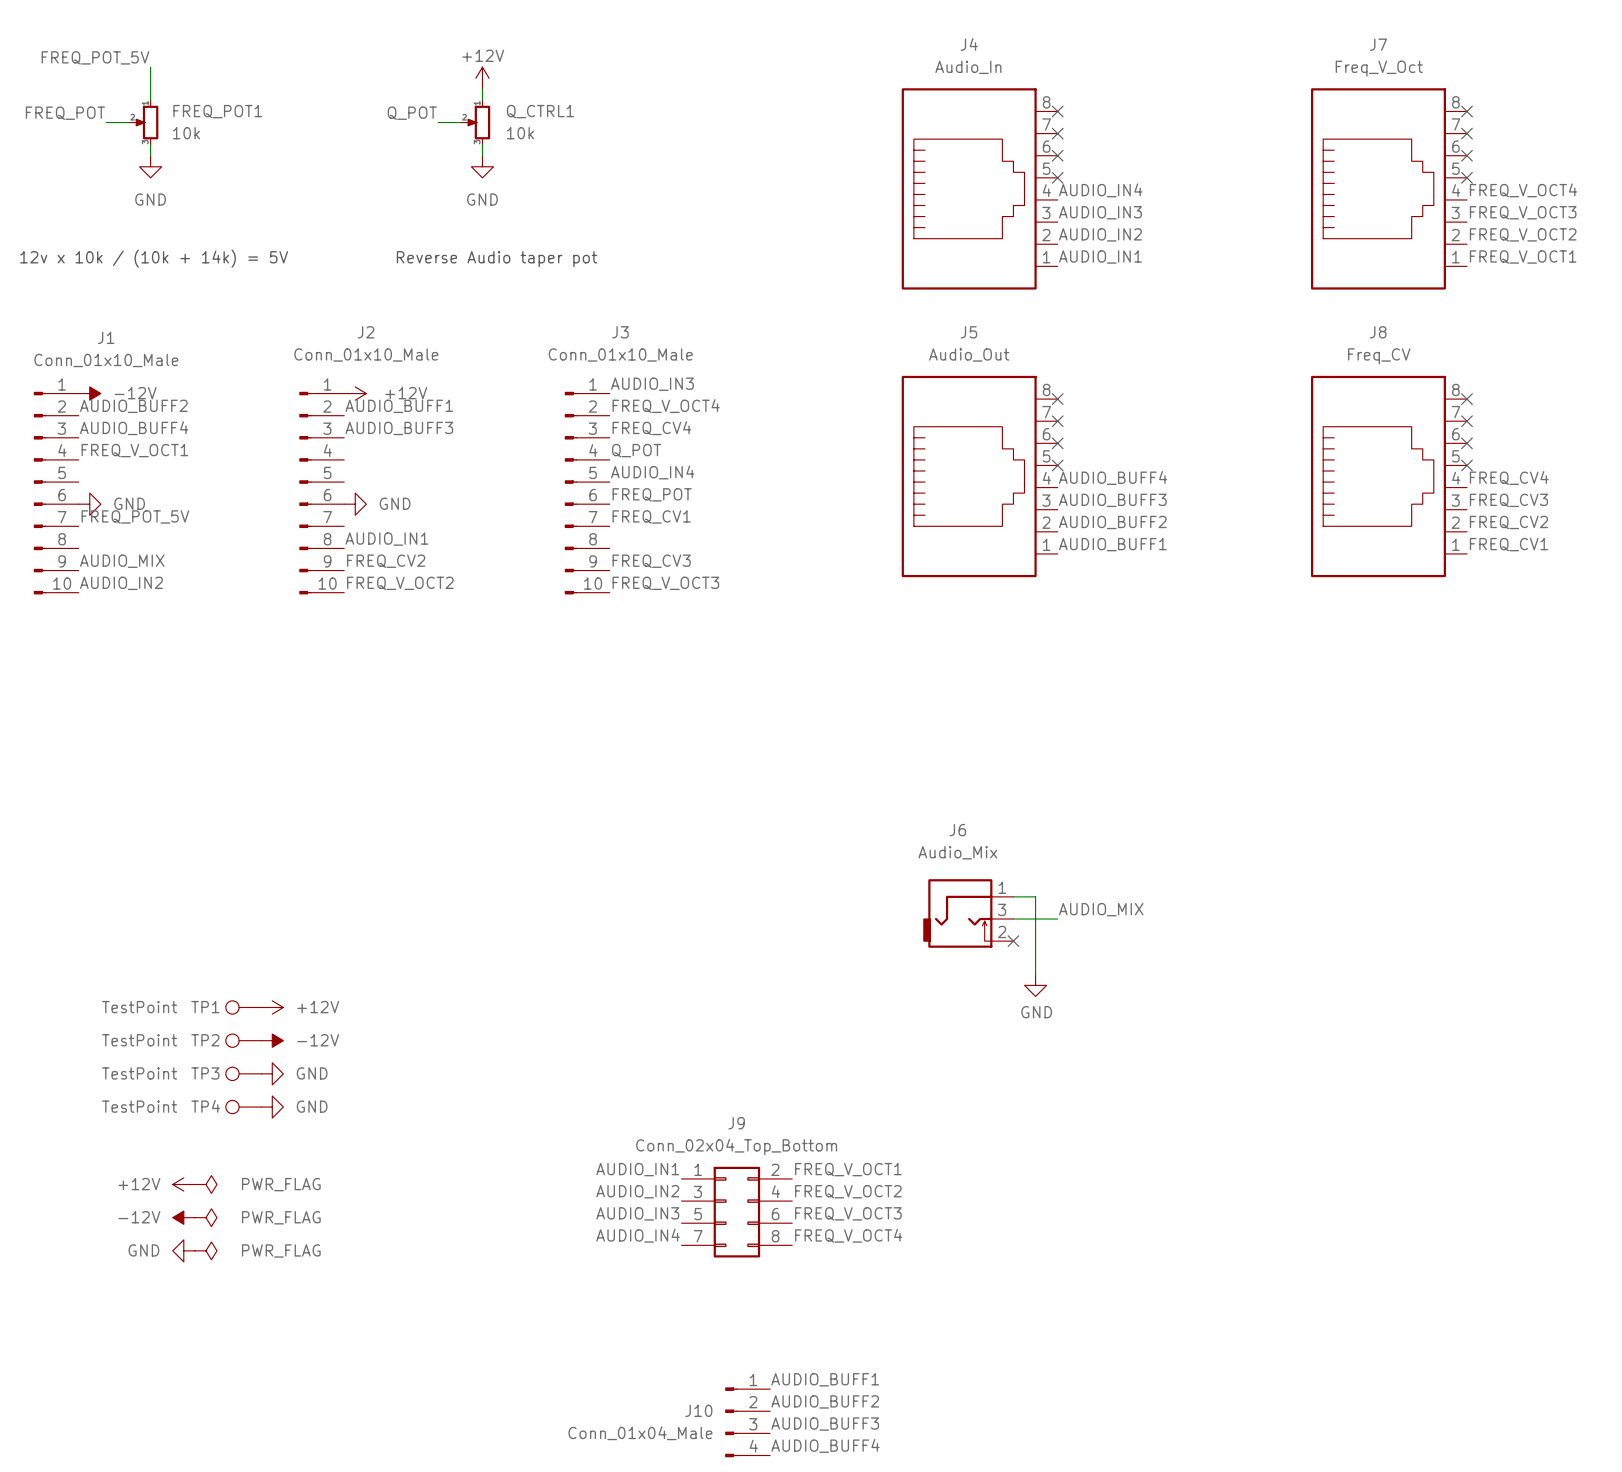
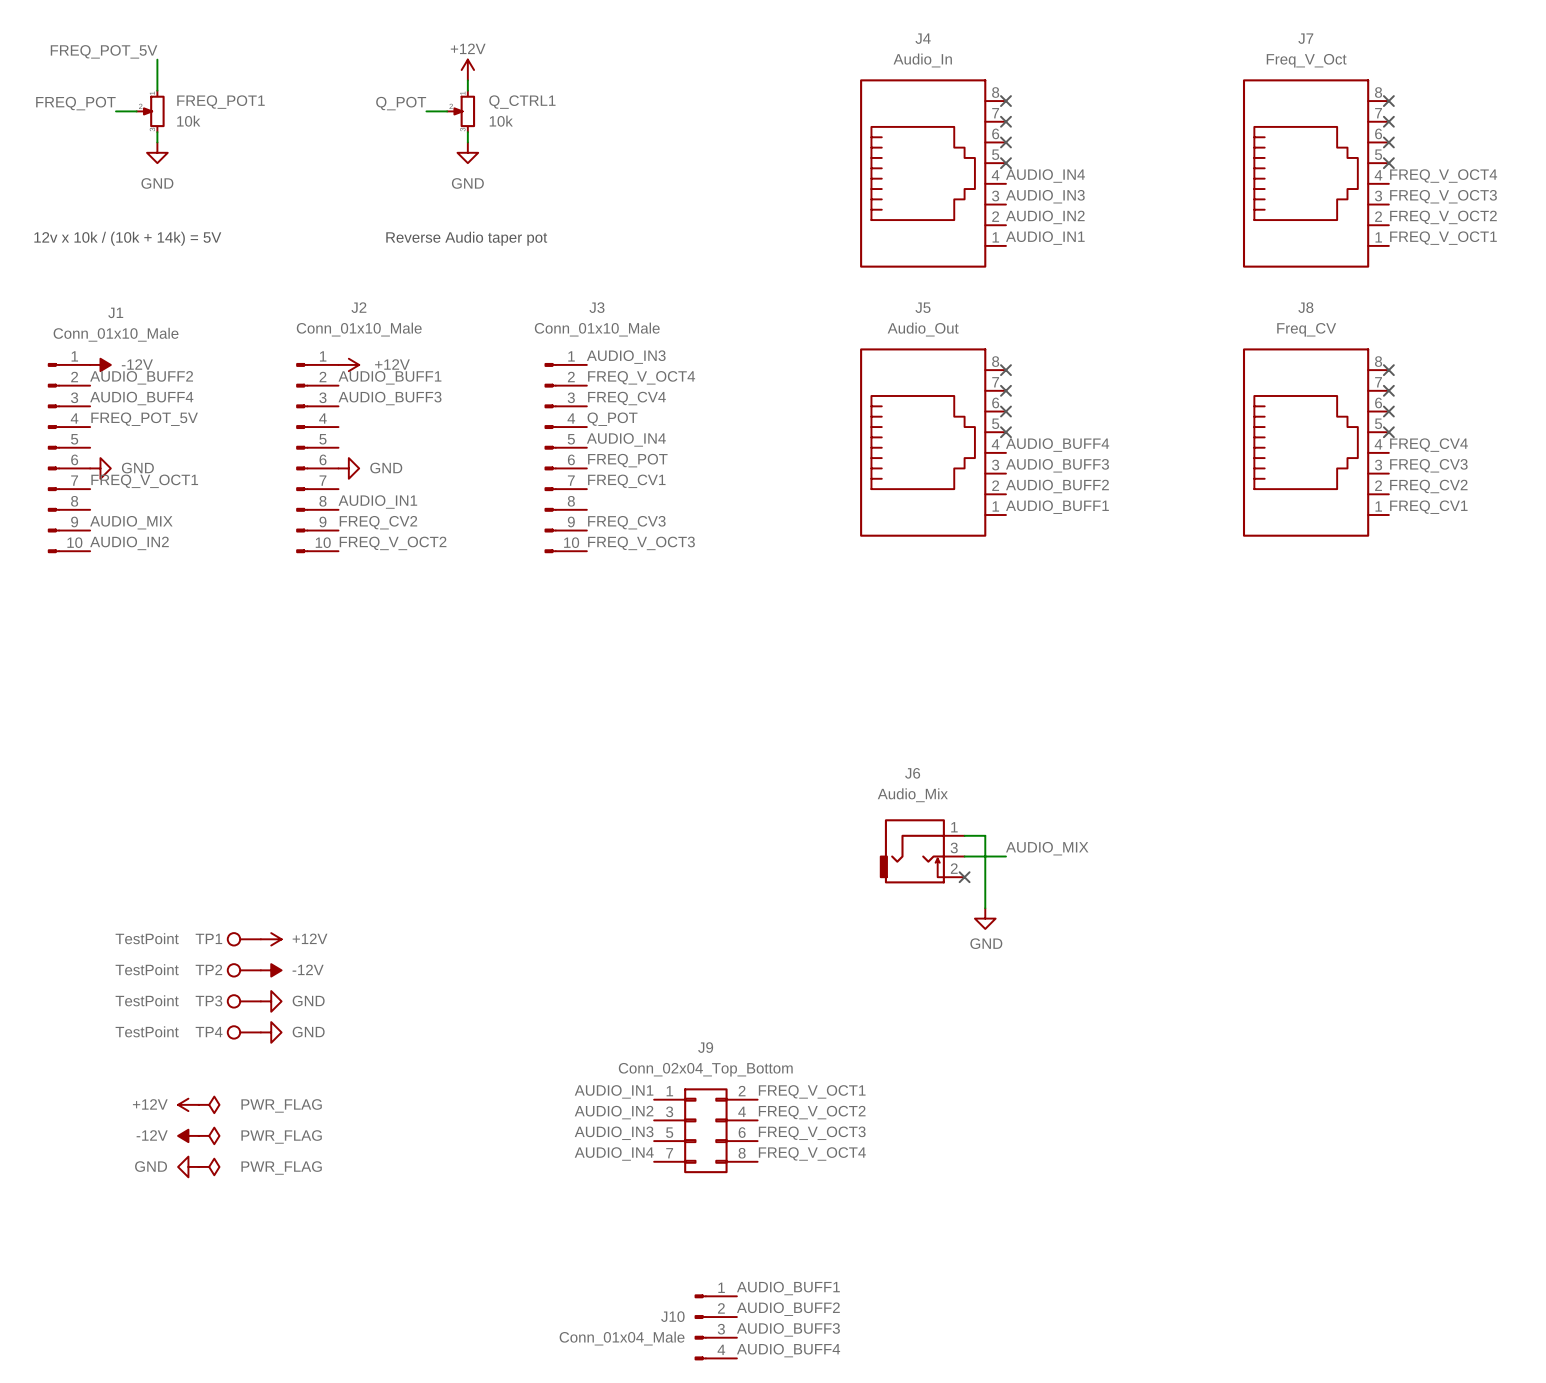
label: FREQ_V_OCT1 (134, 450) -> FREQ_POT_5V (144, 419)
label: FREQ_POT_5V (135, 516) -> FREQ_V_OCT1 (144, 481)

